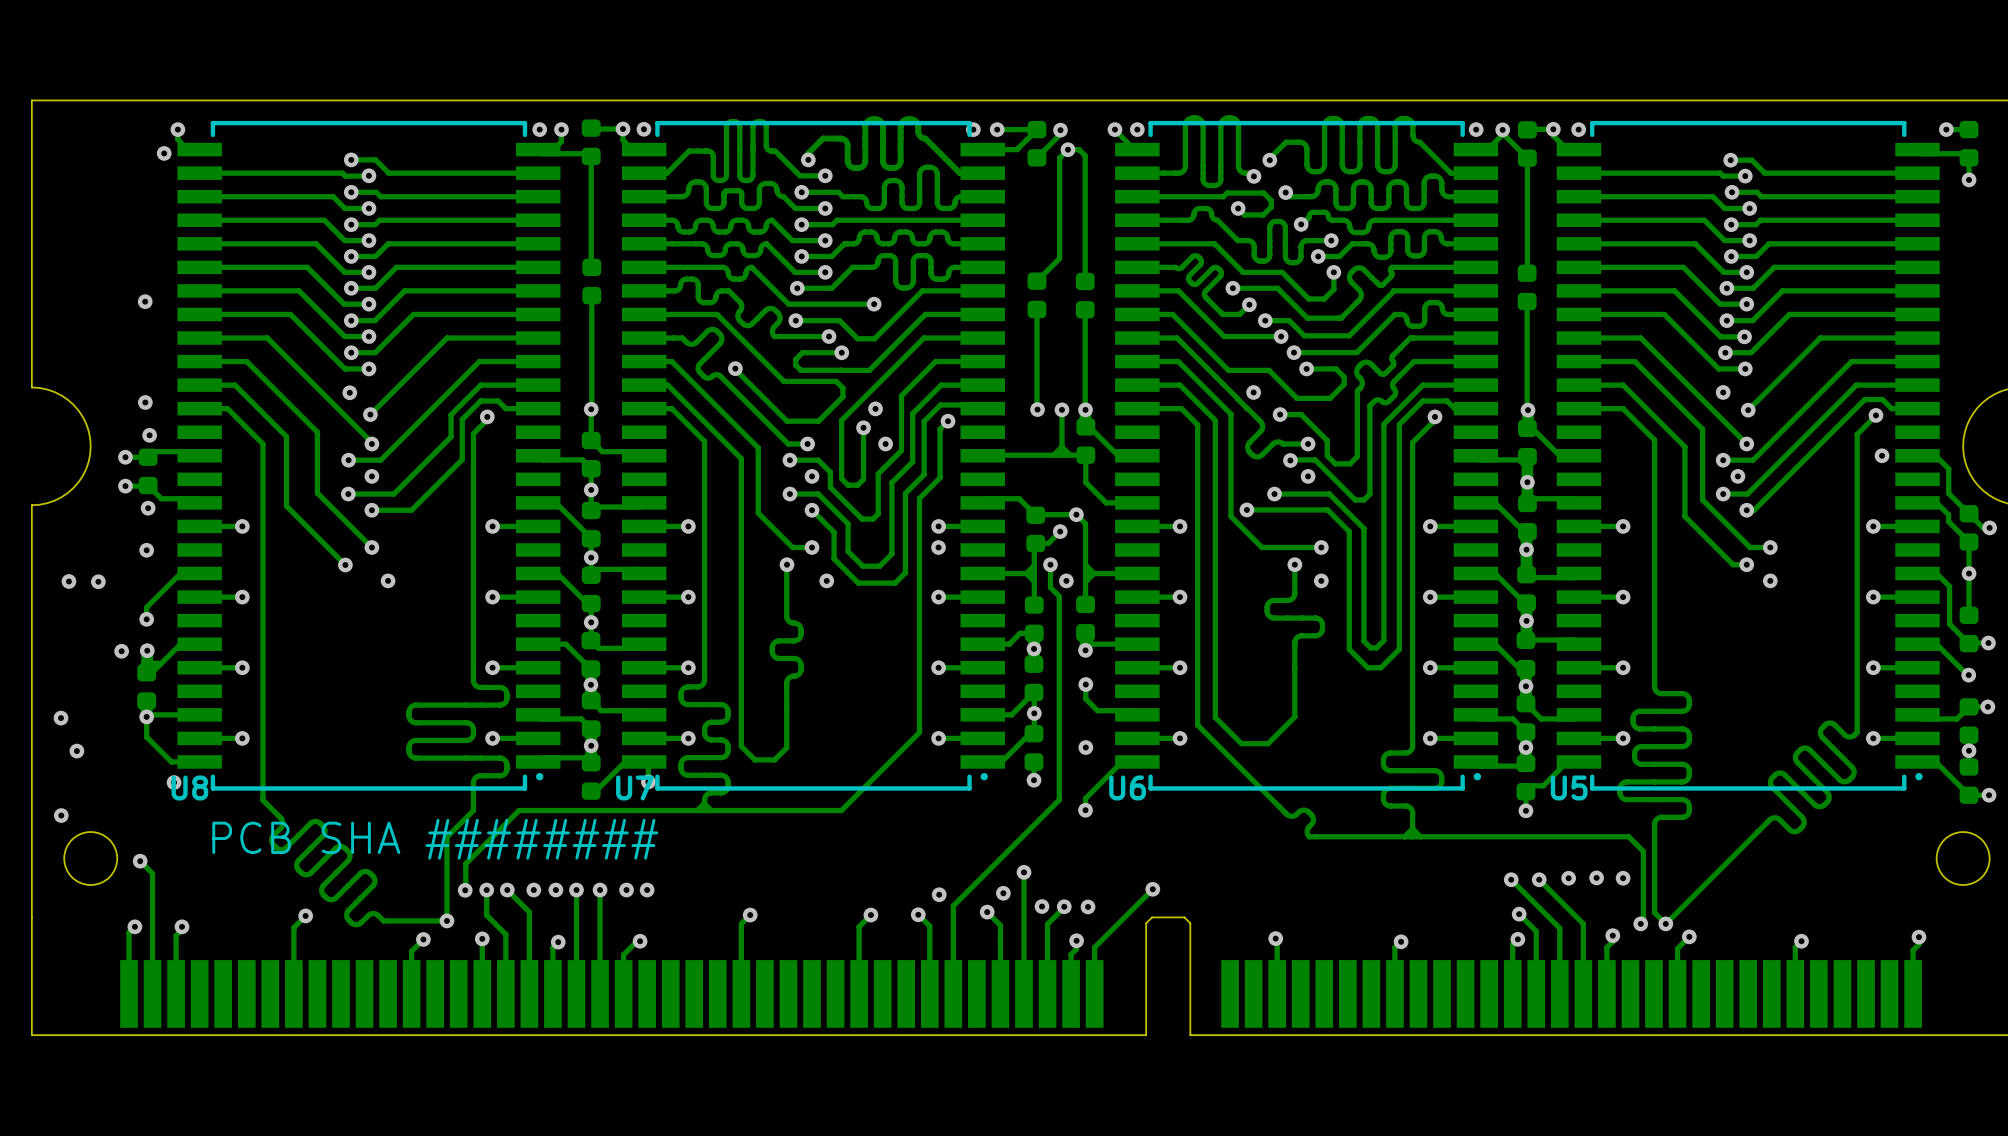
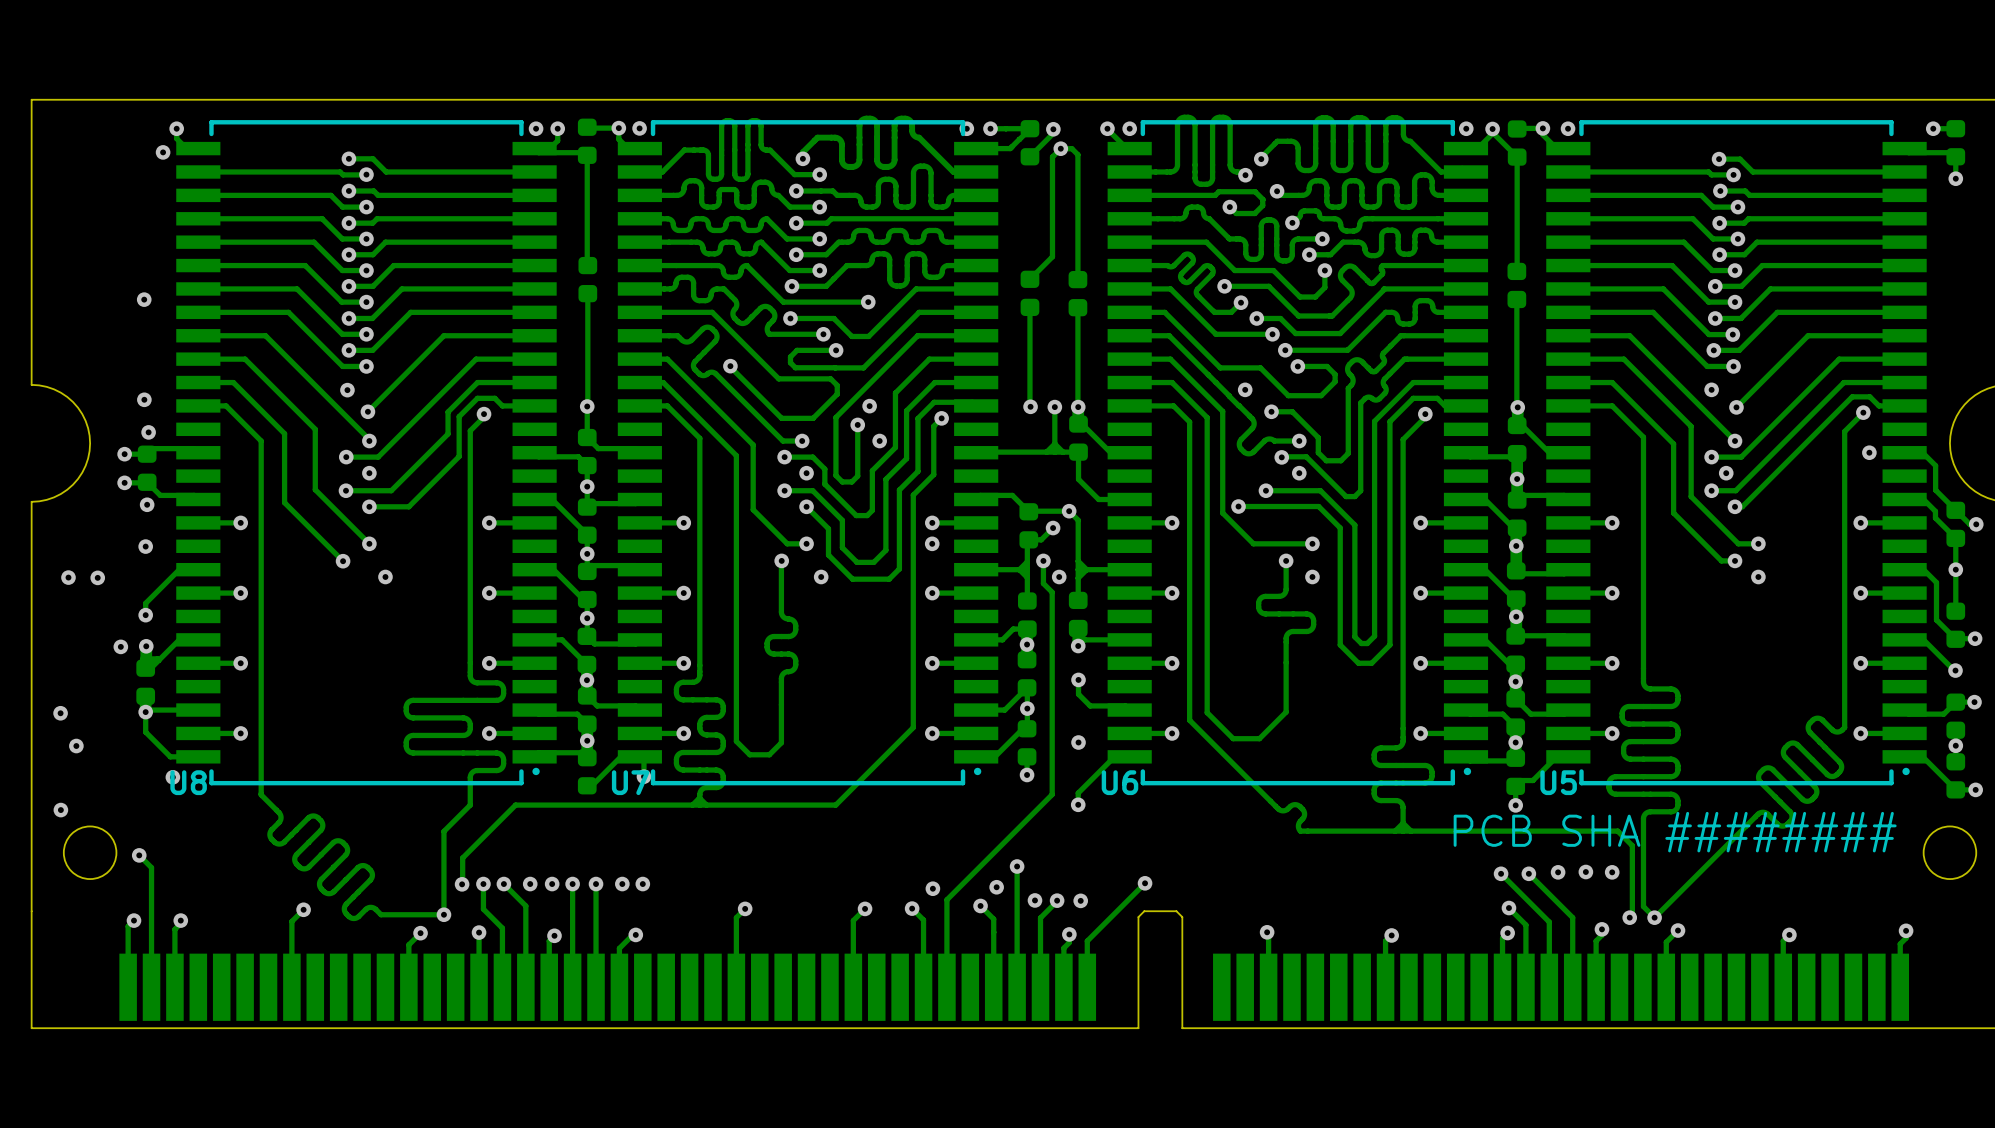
text: none -> PCB SHA ######## (1675, 832)
text: PCB SHA ######## (435, 839) -> none

